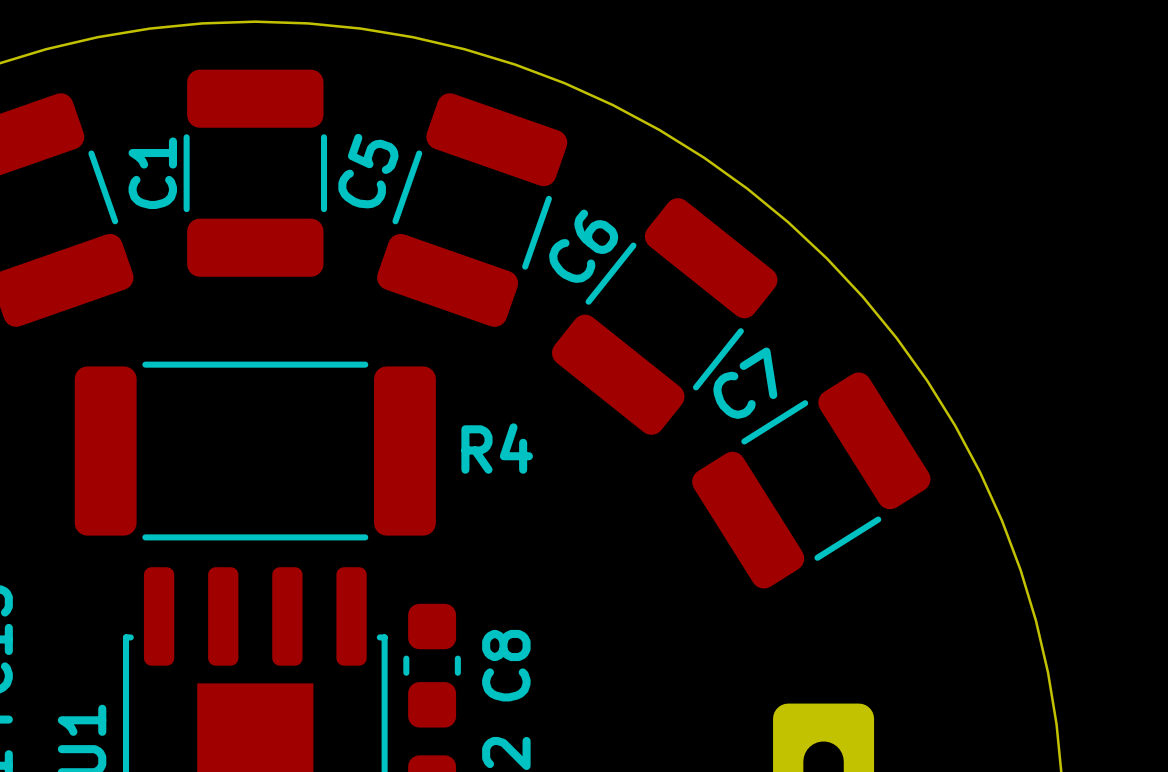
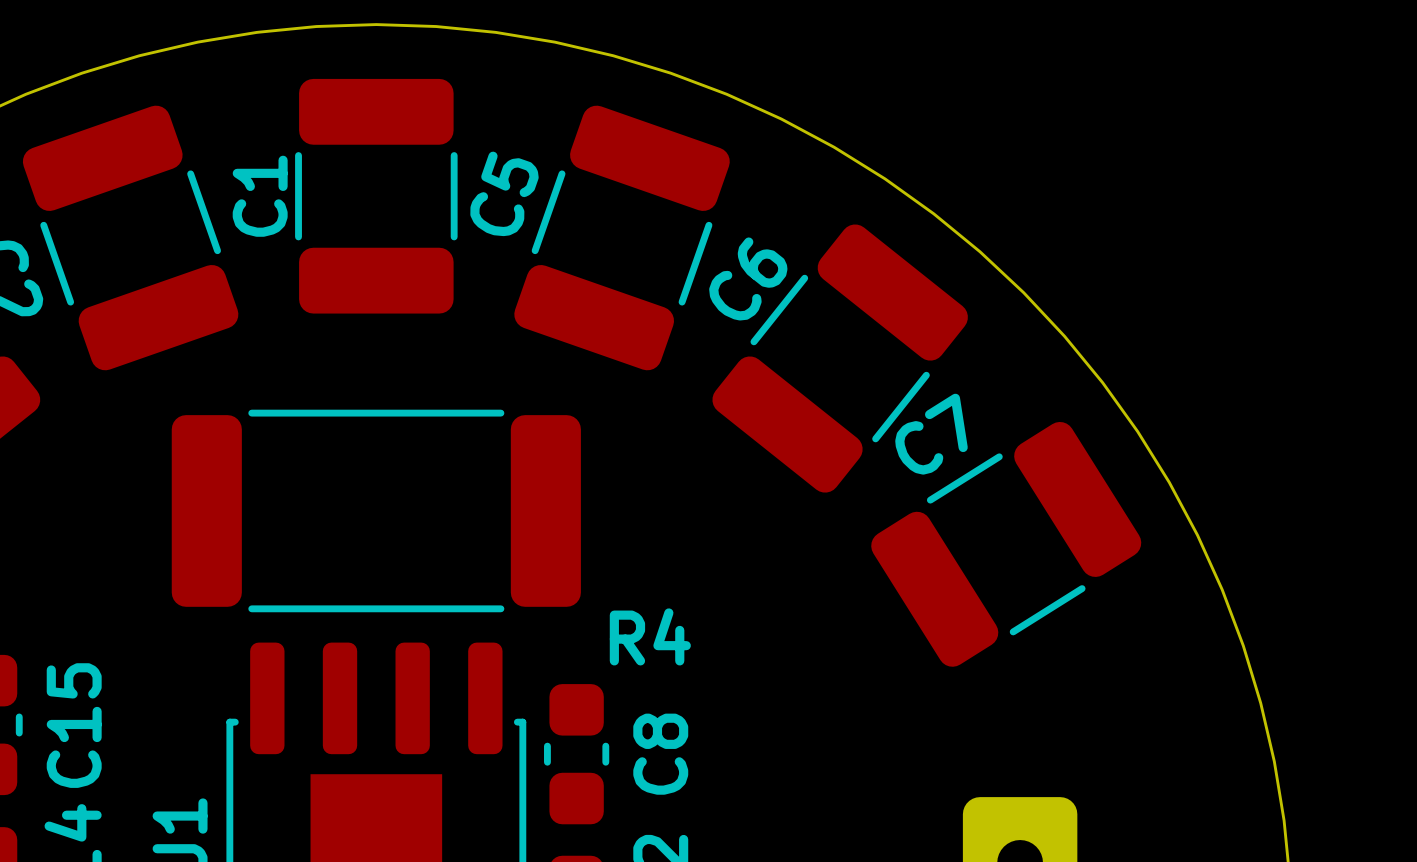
R4 name position: R4 (497, 448) -> R4 (650, 636)

